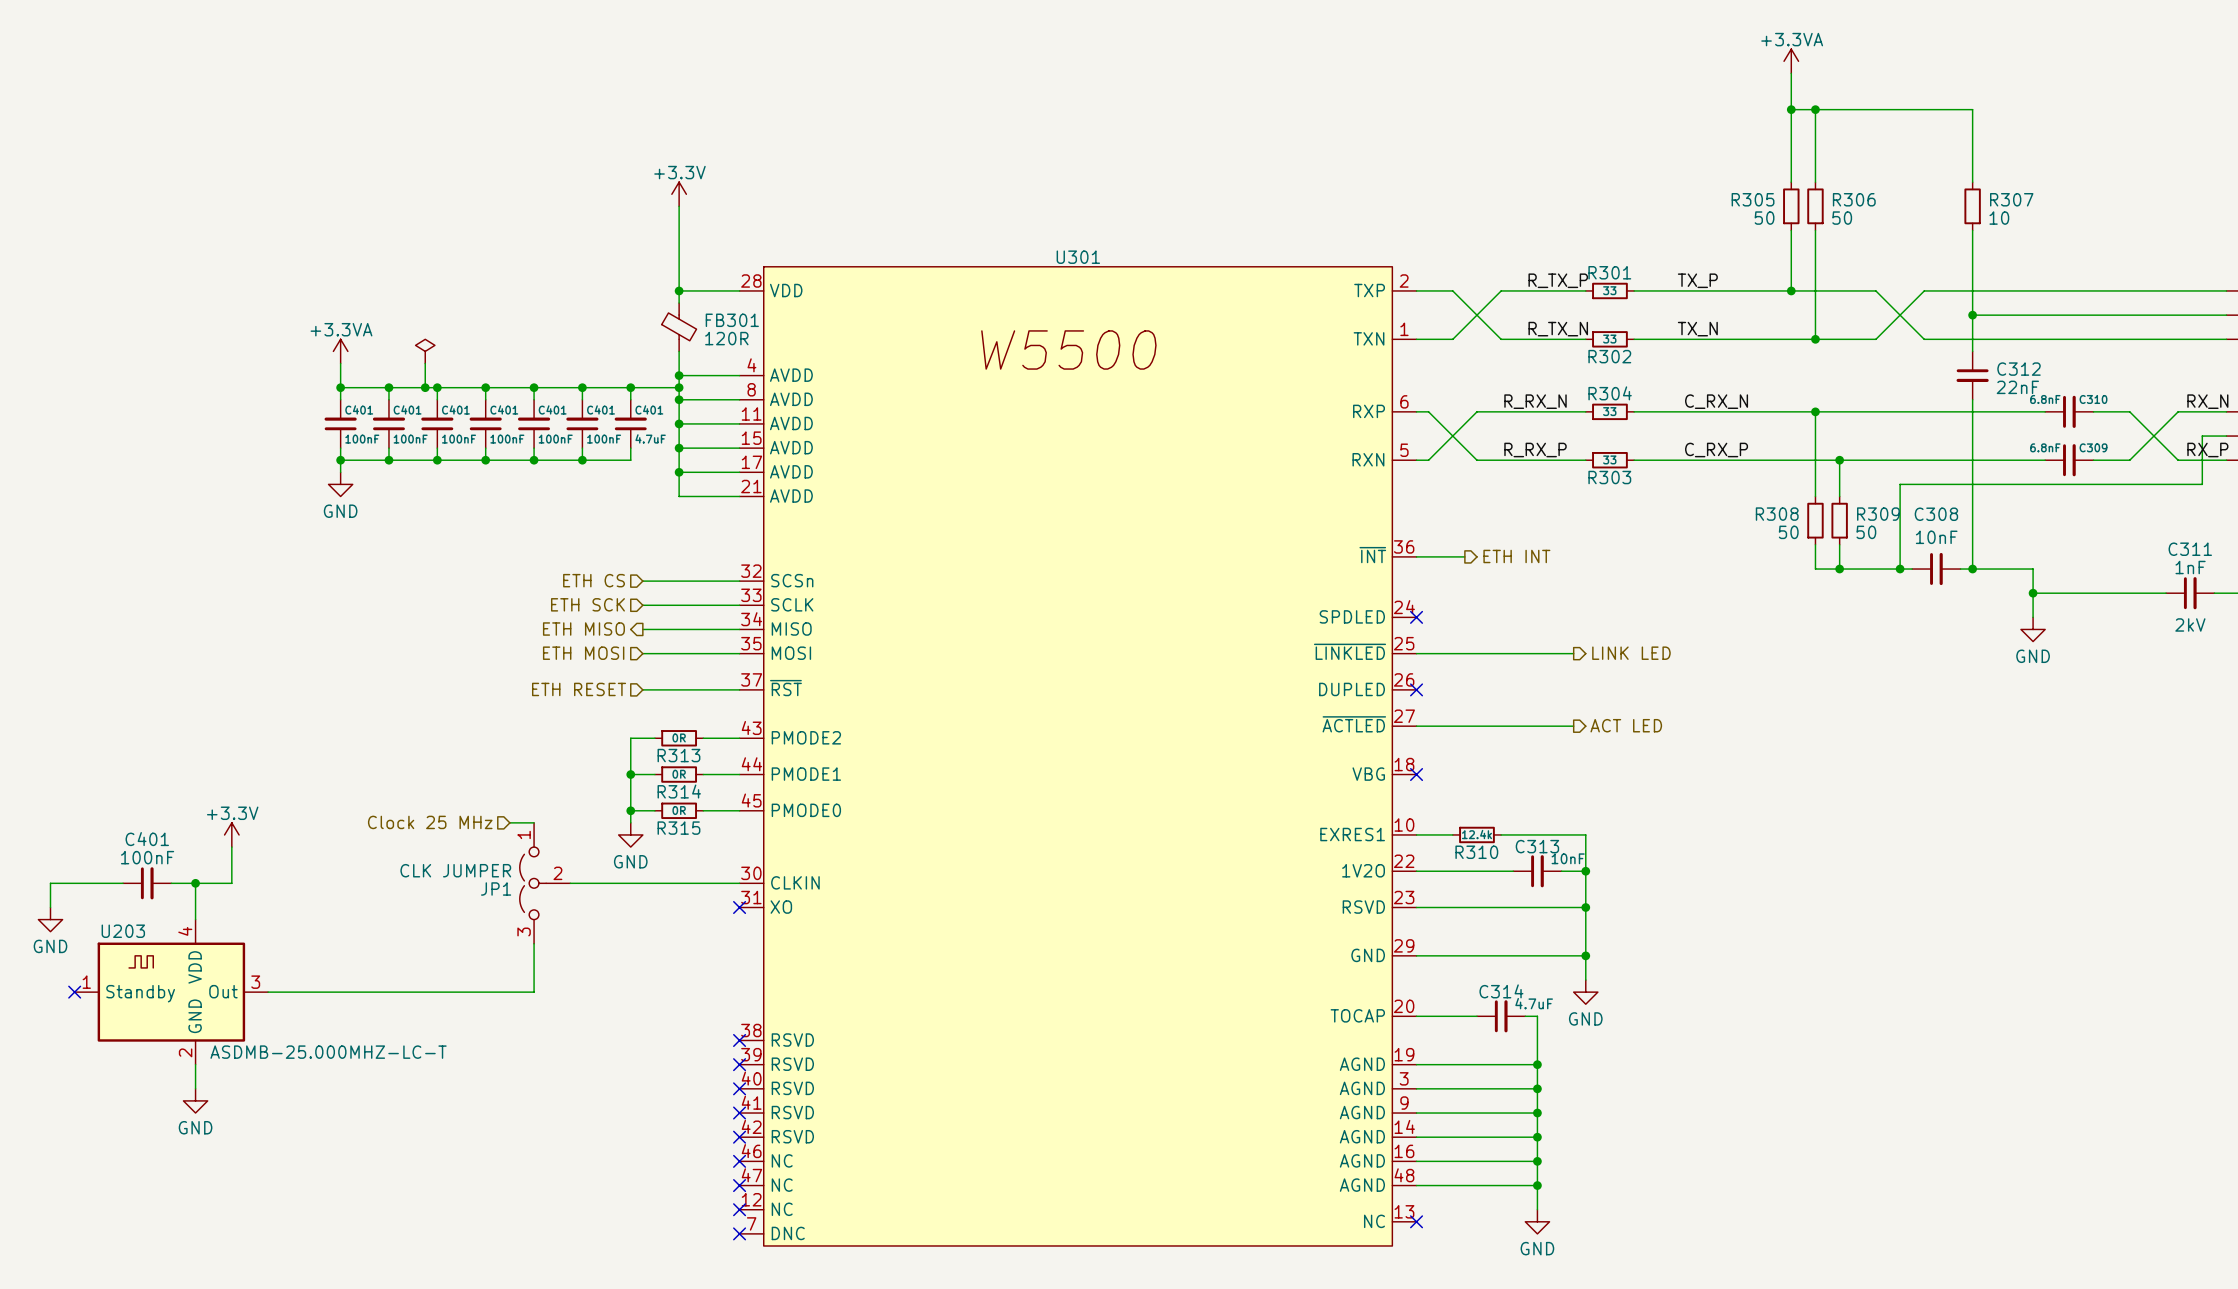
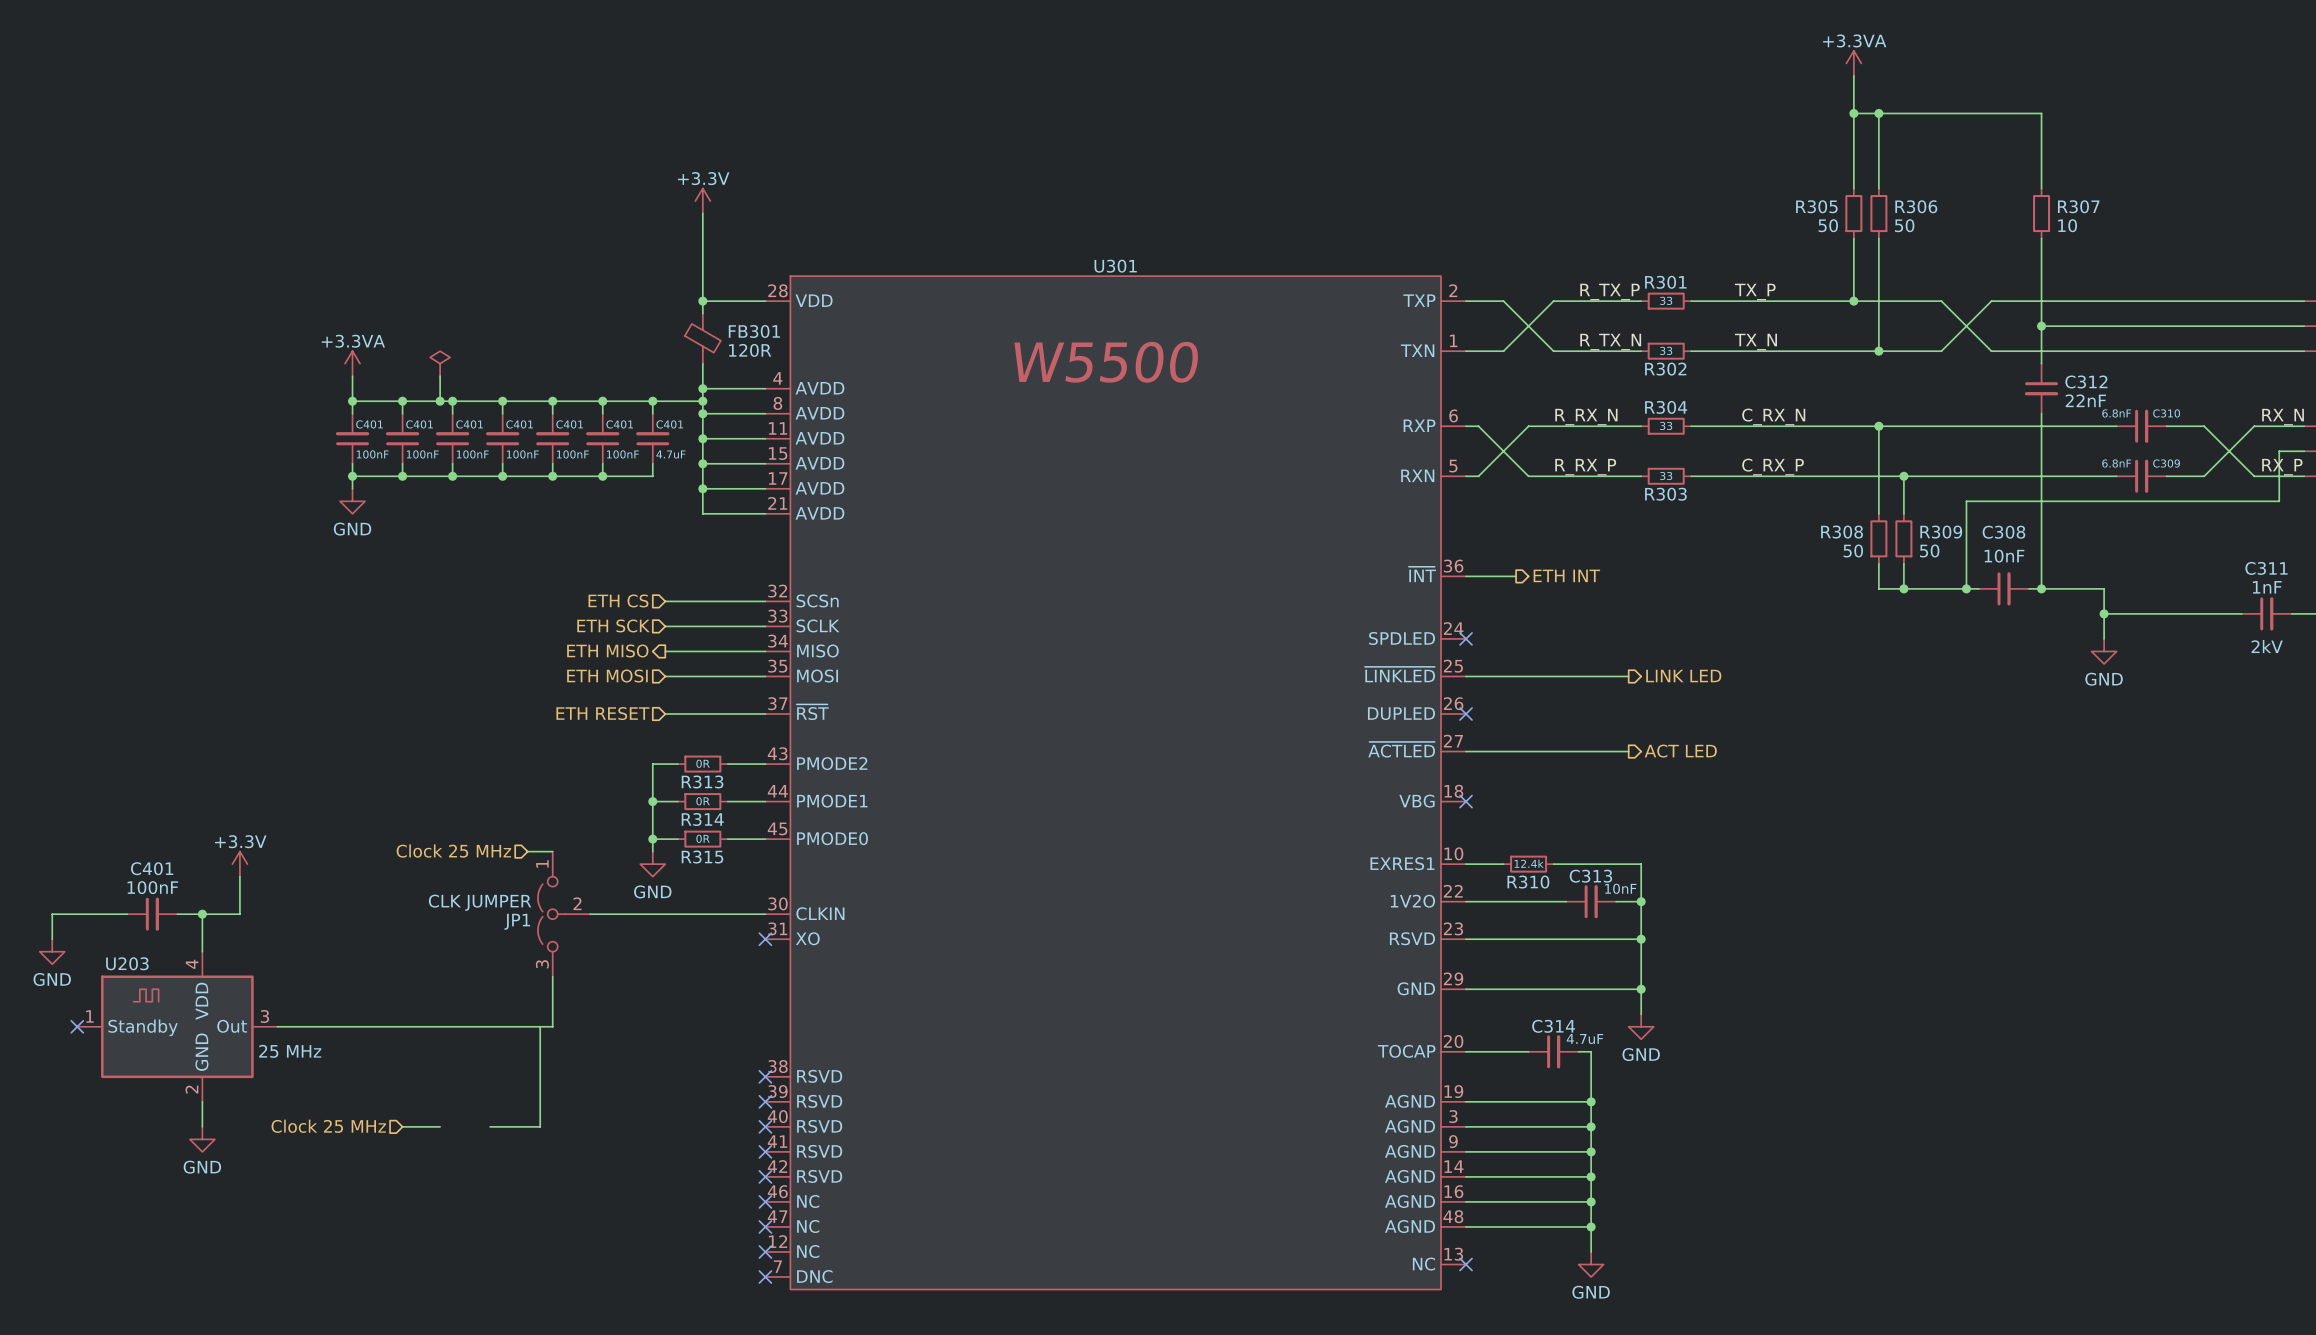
wire: none -> (540, 1026) (540, 1126) (490, 1126)
U203 value: ASDMB-25.000MHZ-LC-T (328, 1052) -> 25 MHz (290, 1051)
hierarchical label: none -> Clock 25 MHz (328, 1126)
wire: none -> (402, 1126) (440, 1126)

